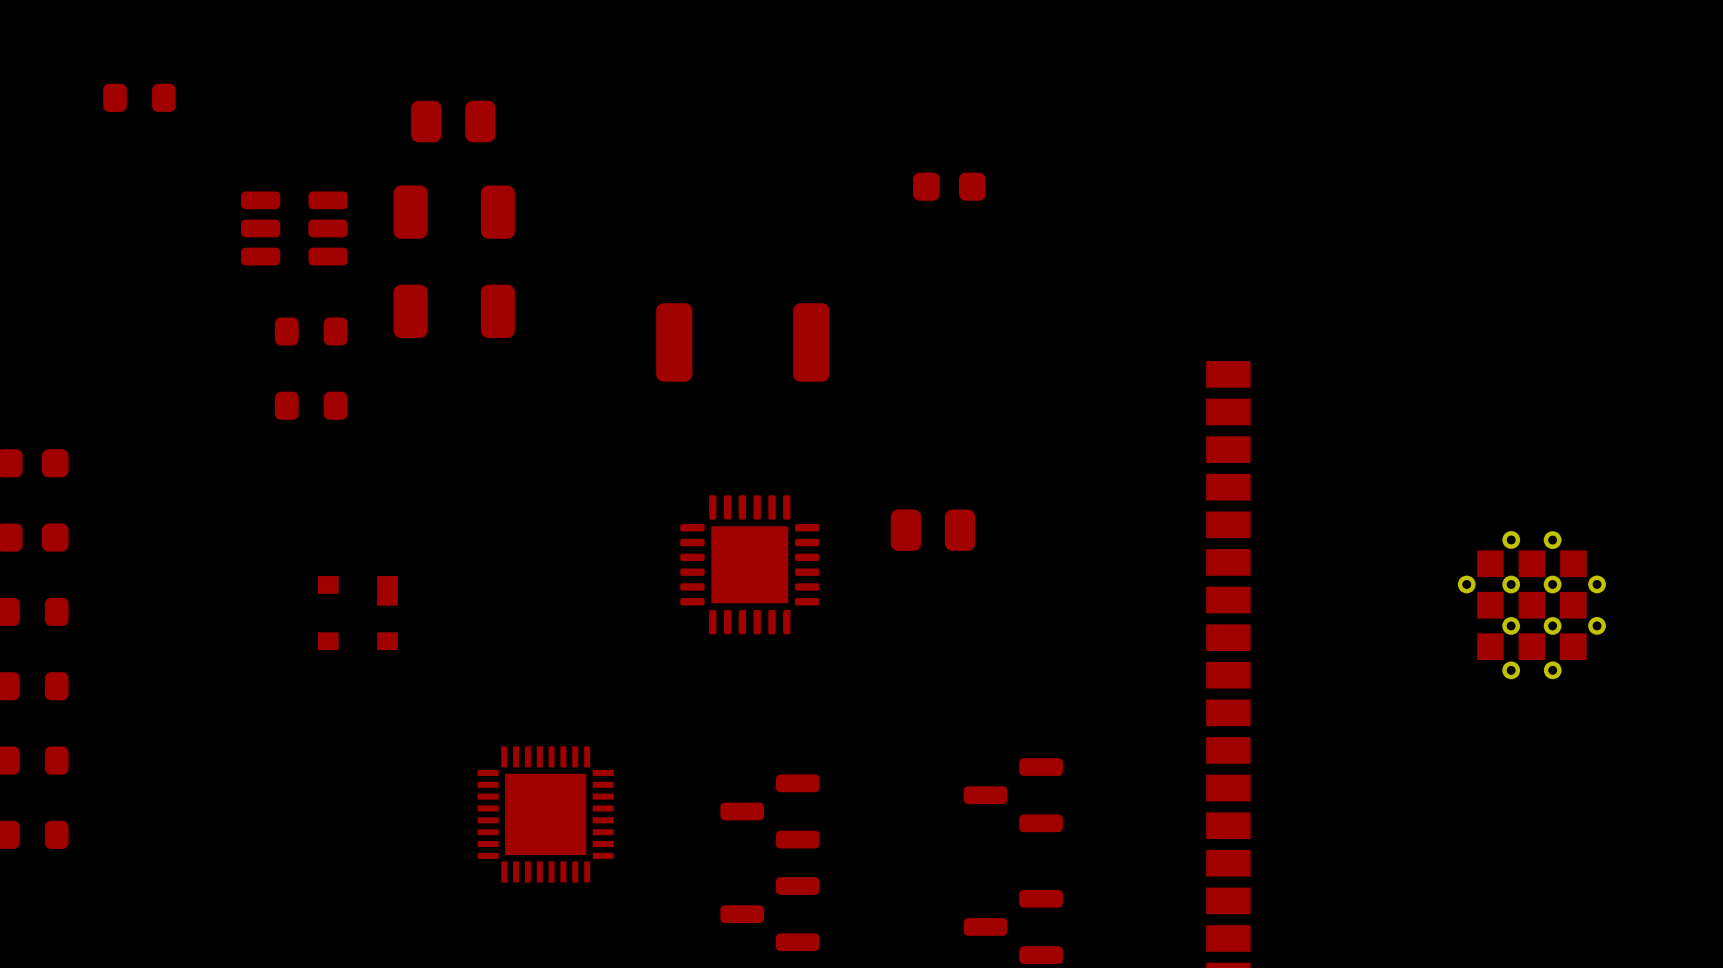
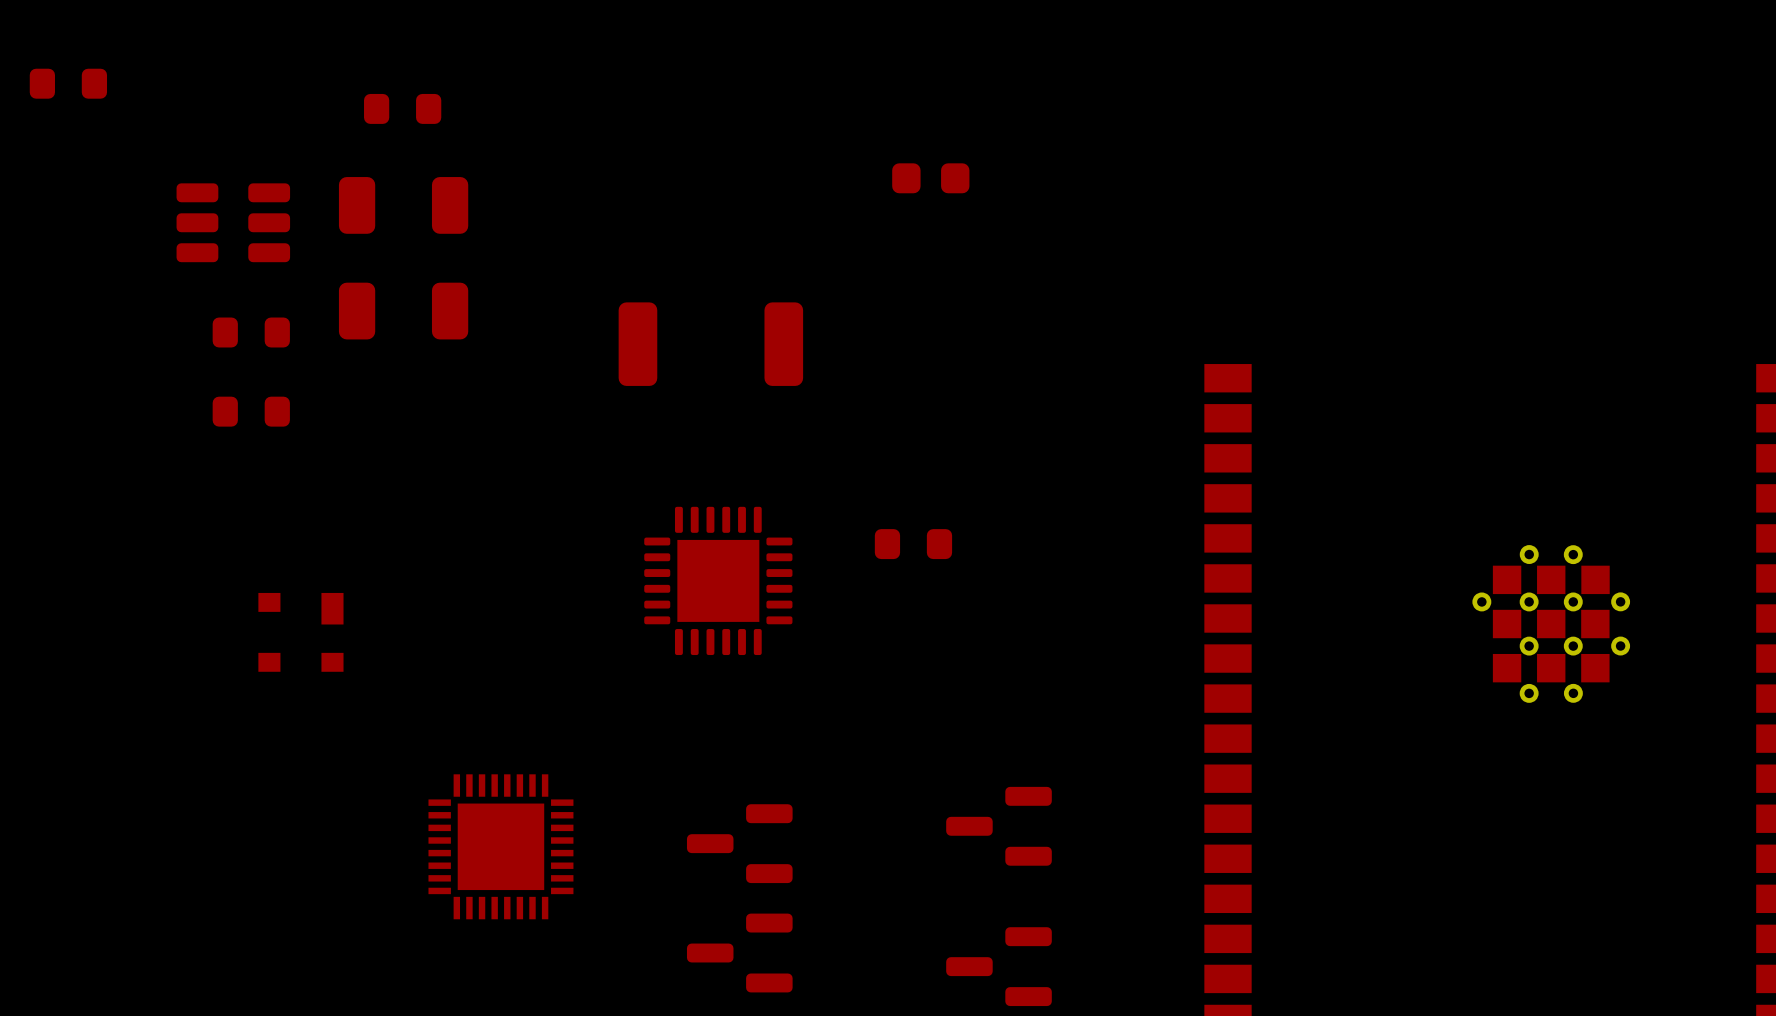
part footprint: [411, 100, 496, 143] -> [364, 93, 442, 124]
part footprint: [890, 509, 976, 551] -> [874, 529, 953, 560]

